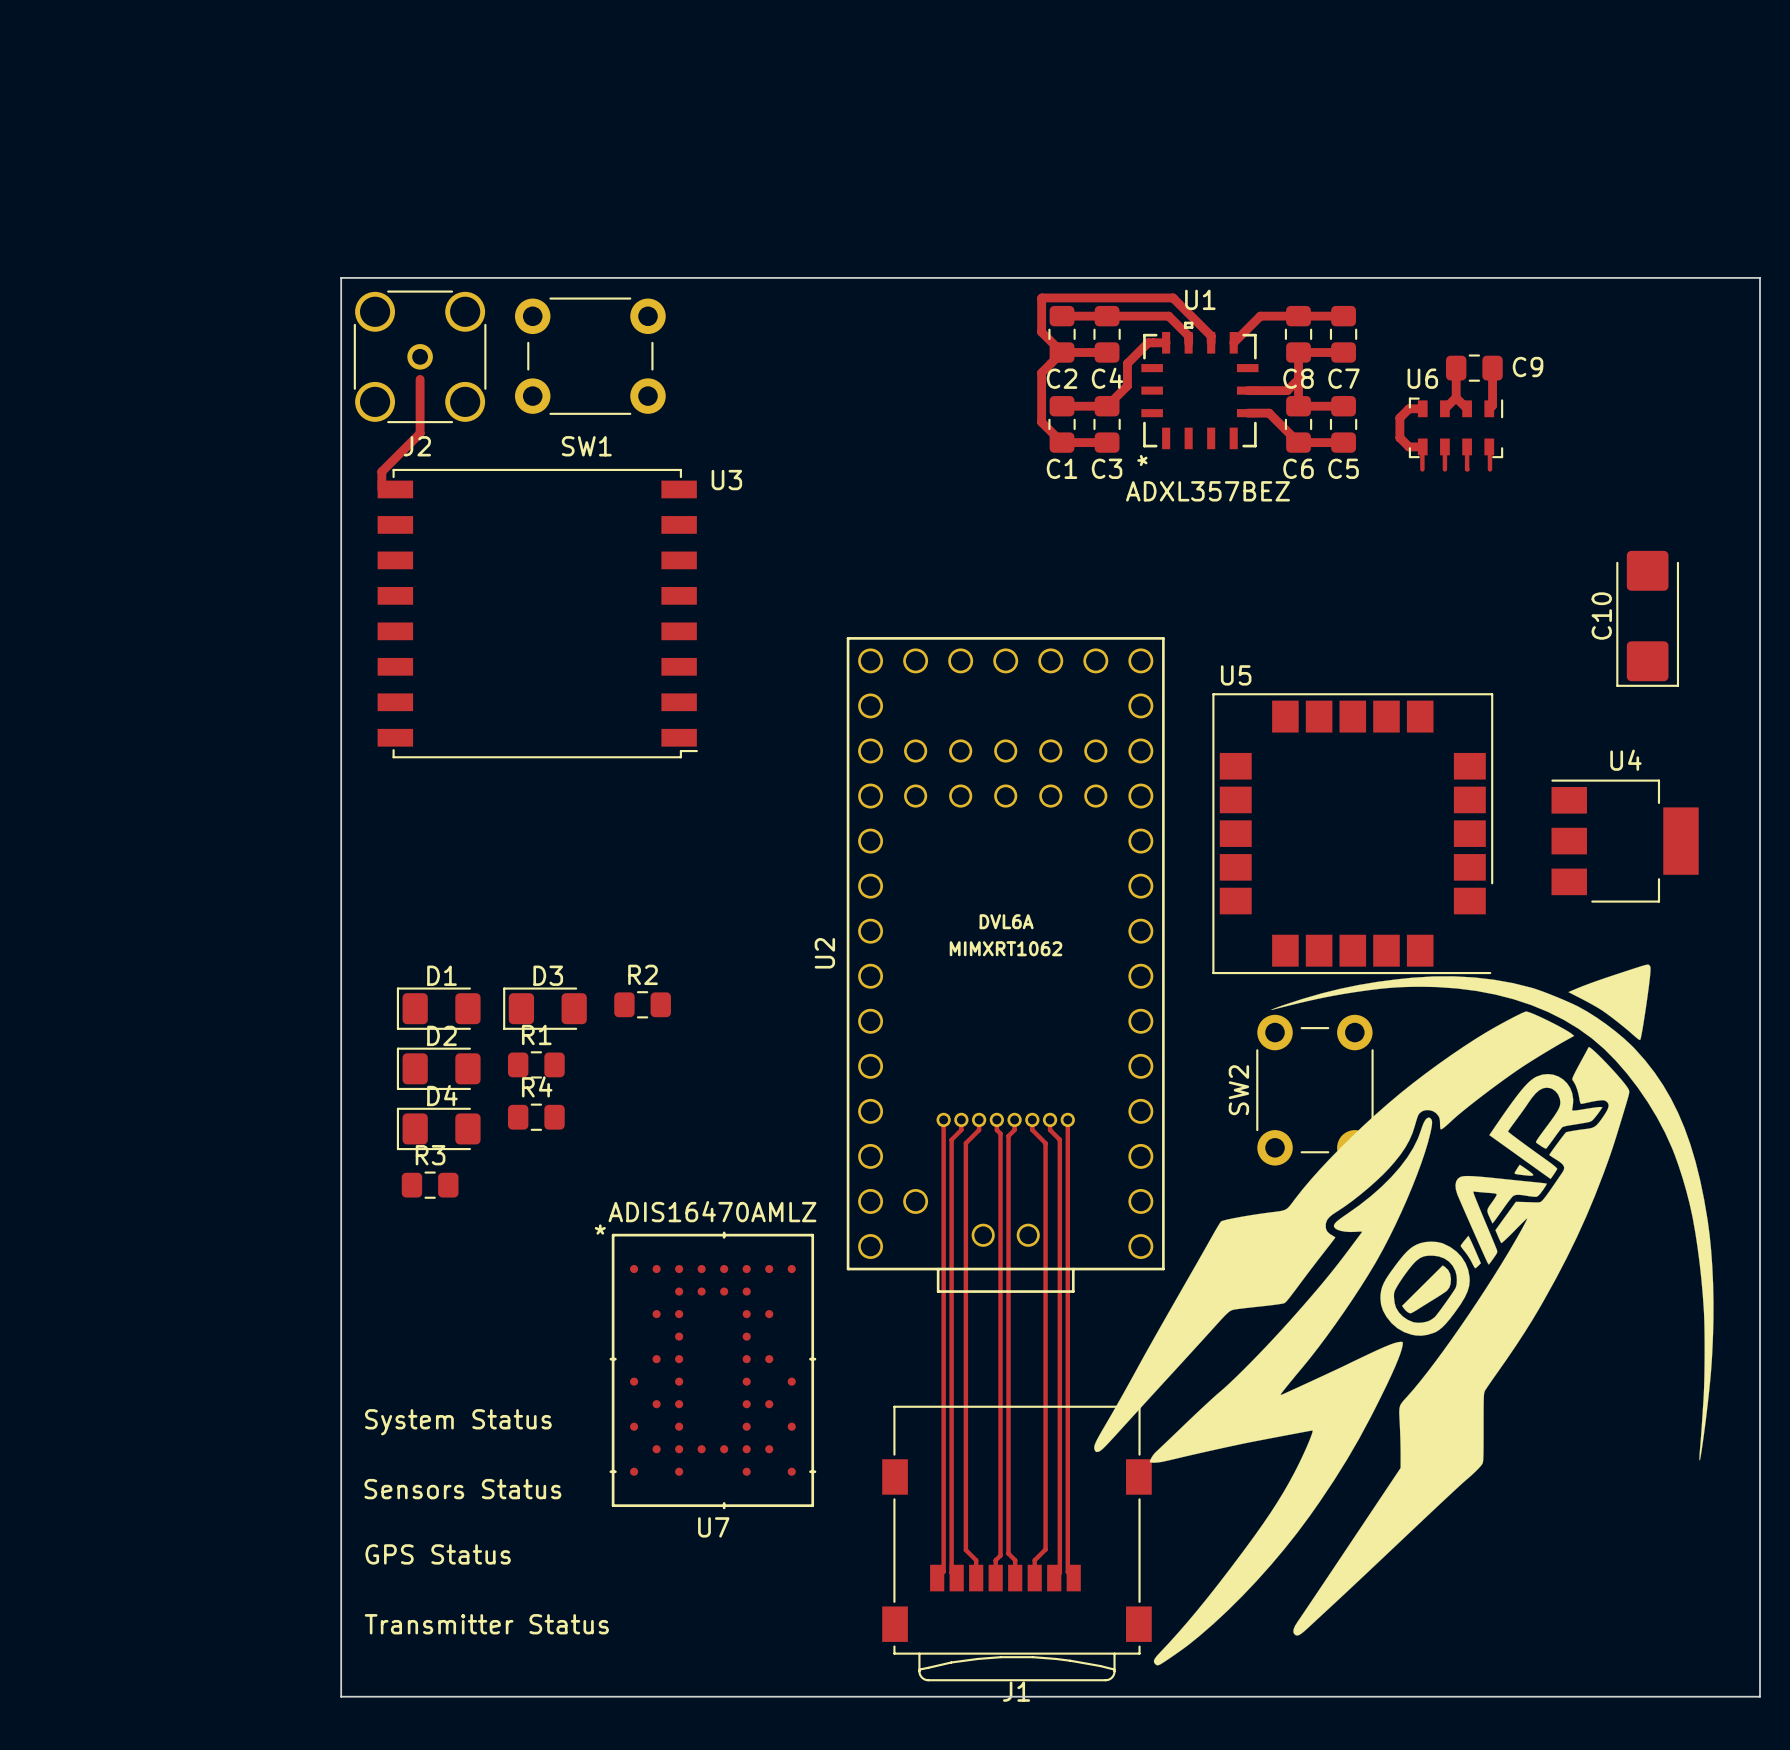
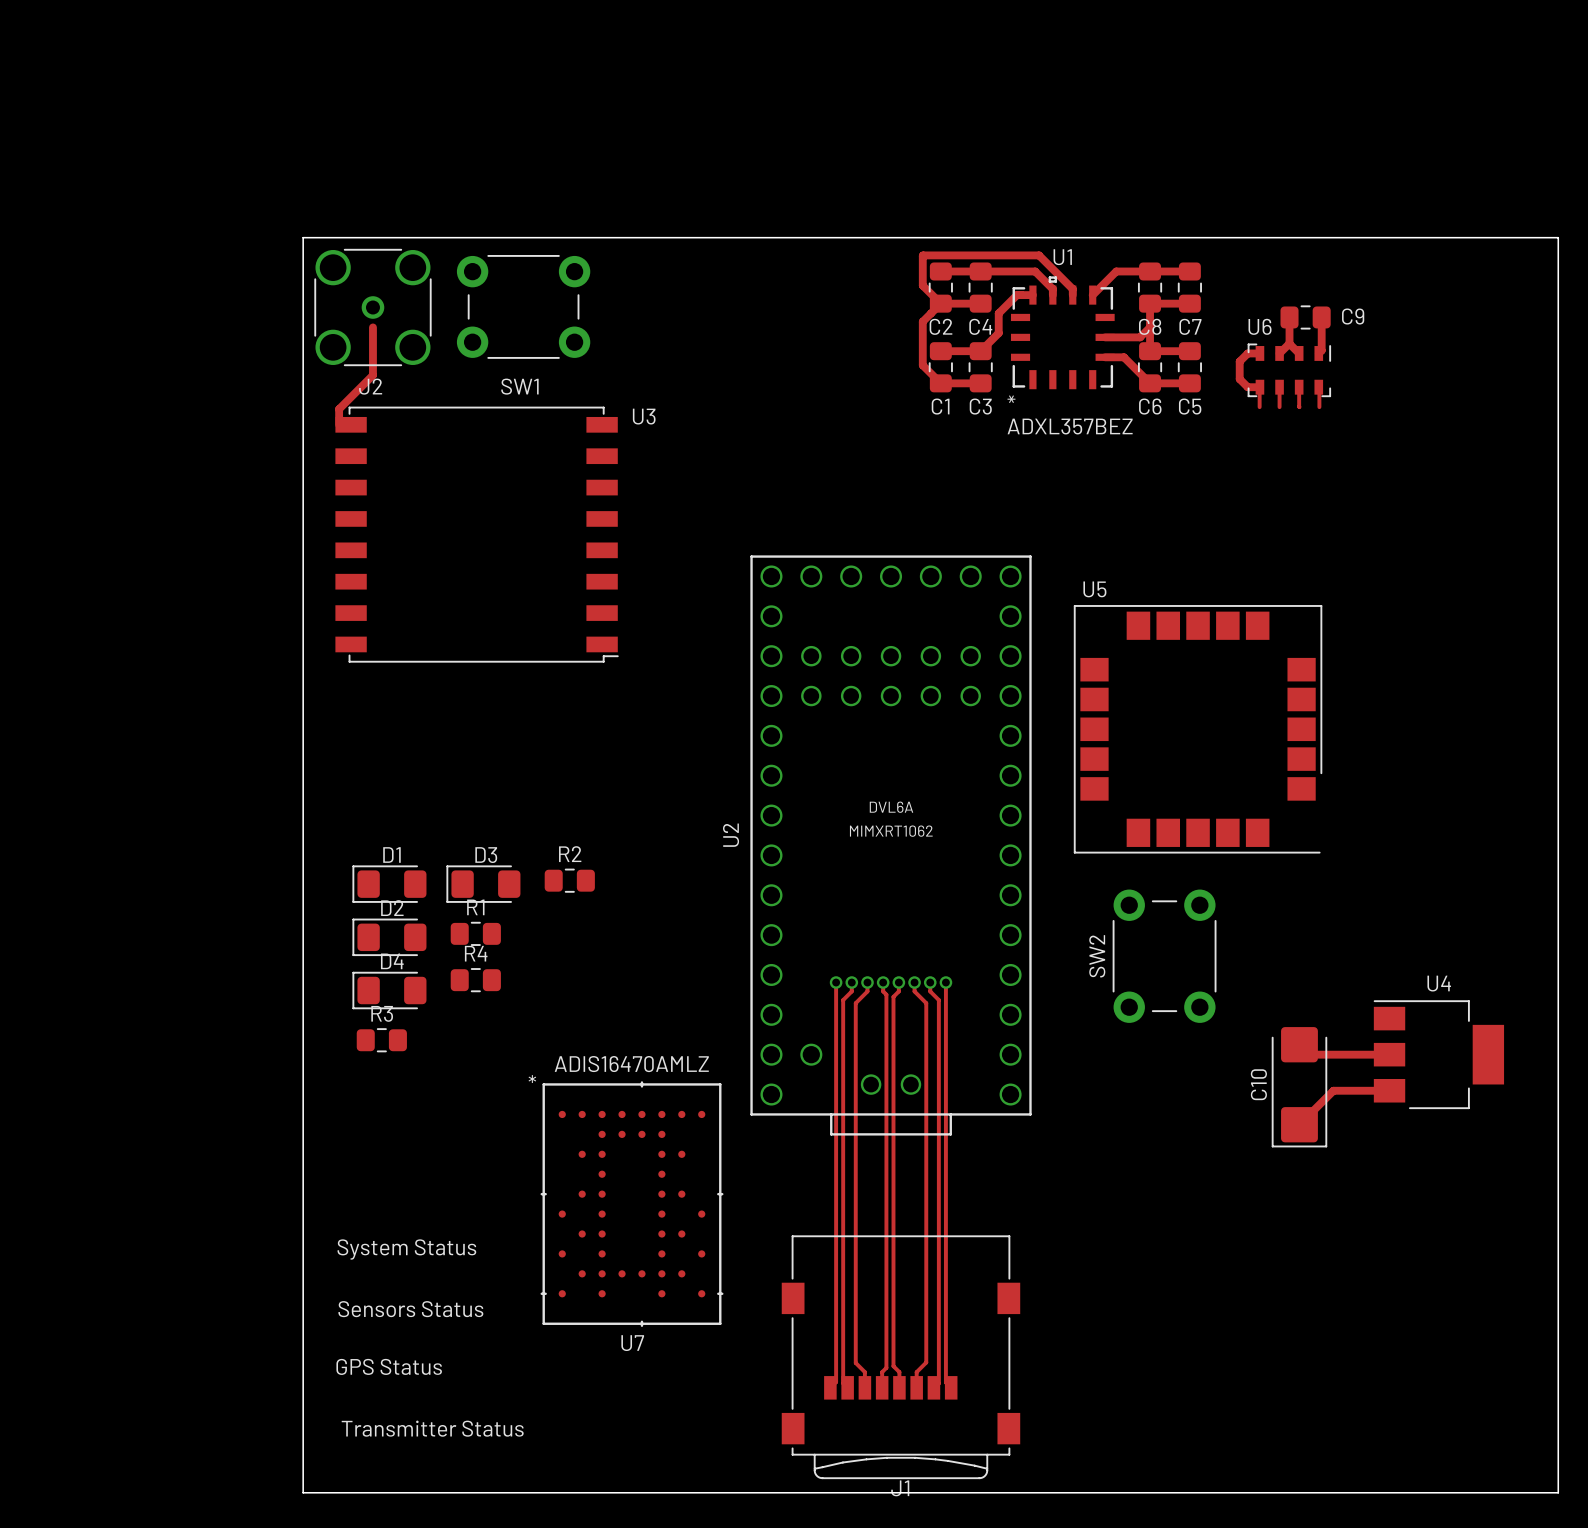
C10 position: (1647, 618) -> (1299, 1087)
U4 position: (1625, 841) -> (1438, 1054)
drawing: [1094, 964, 1714, 1666] -> none
top track: none -> (1299, 1044) (1309, 1054) (1389, 1054)
top track: none -> (1389, 1090) (1333, 1090) (1299, 1124)

